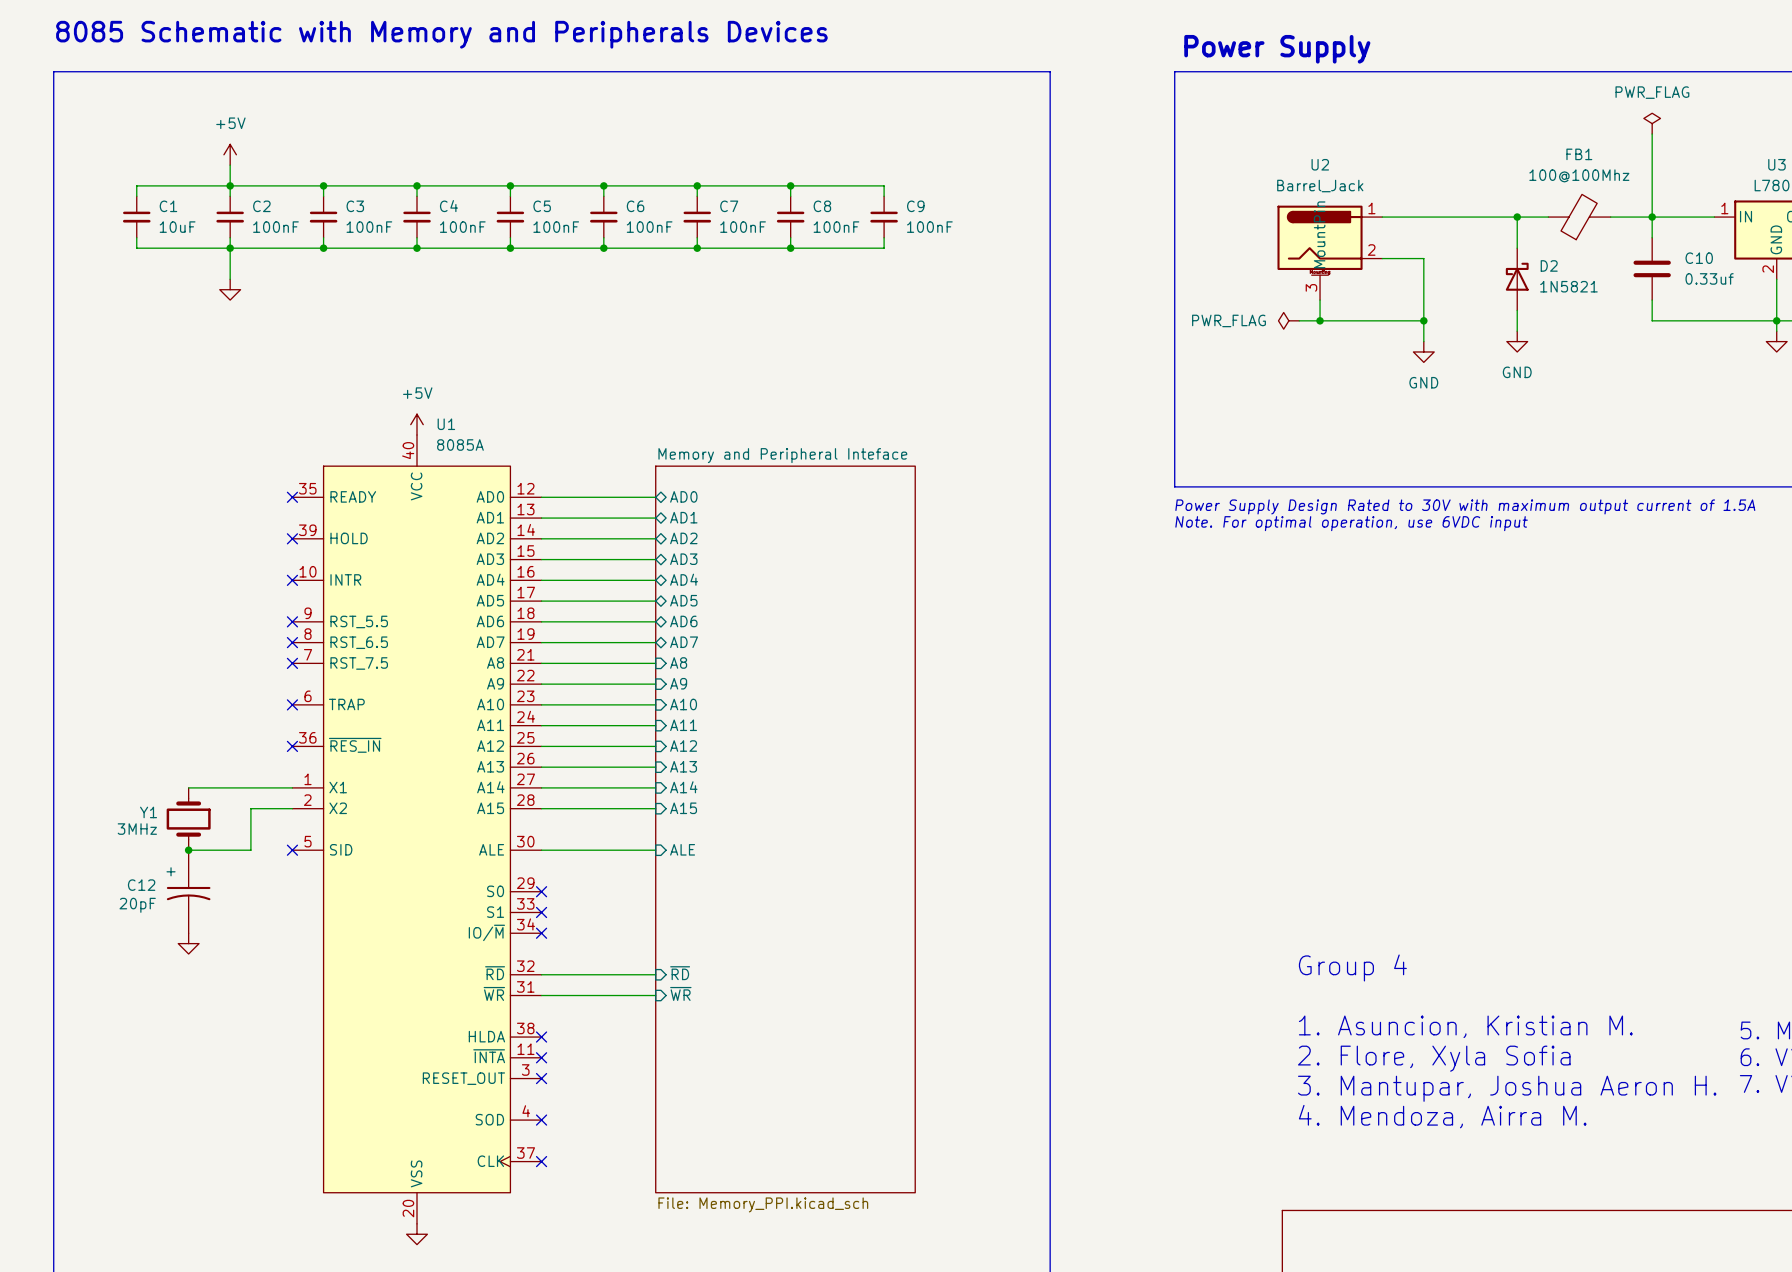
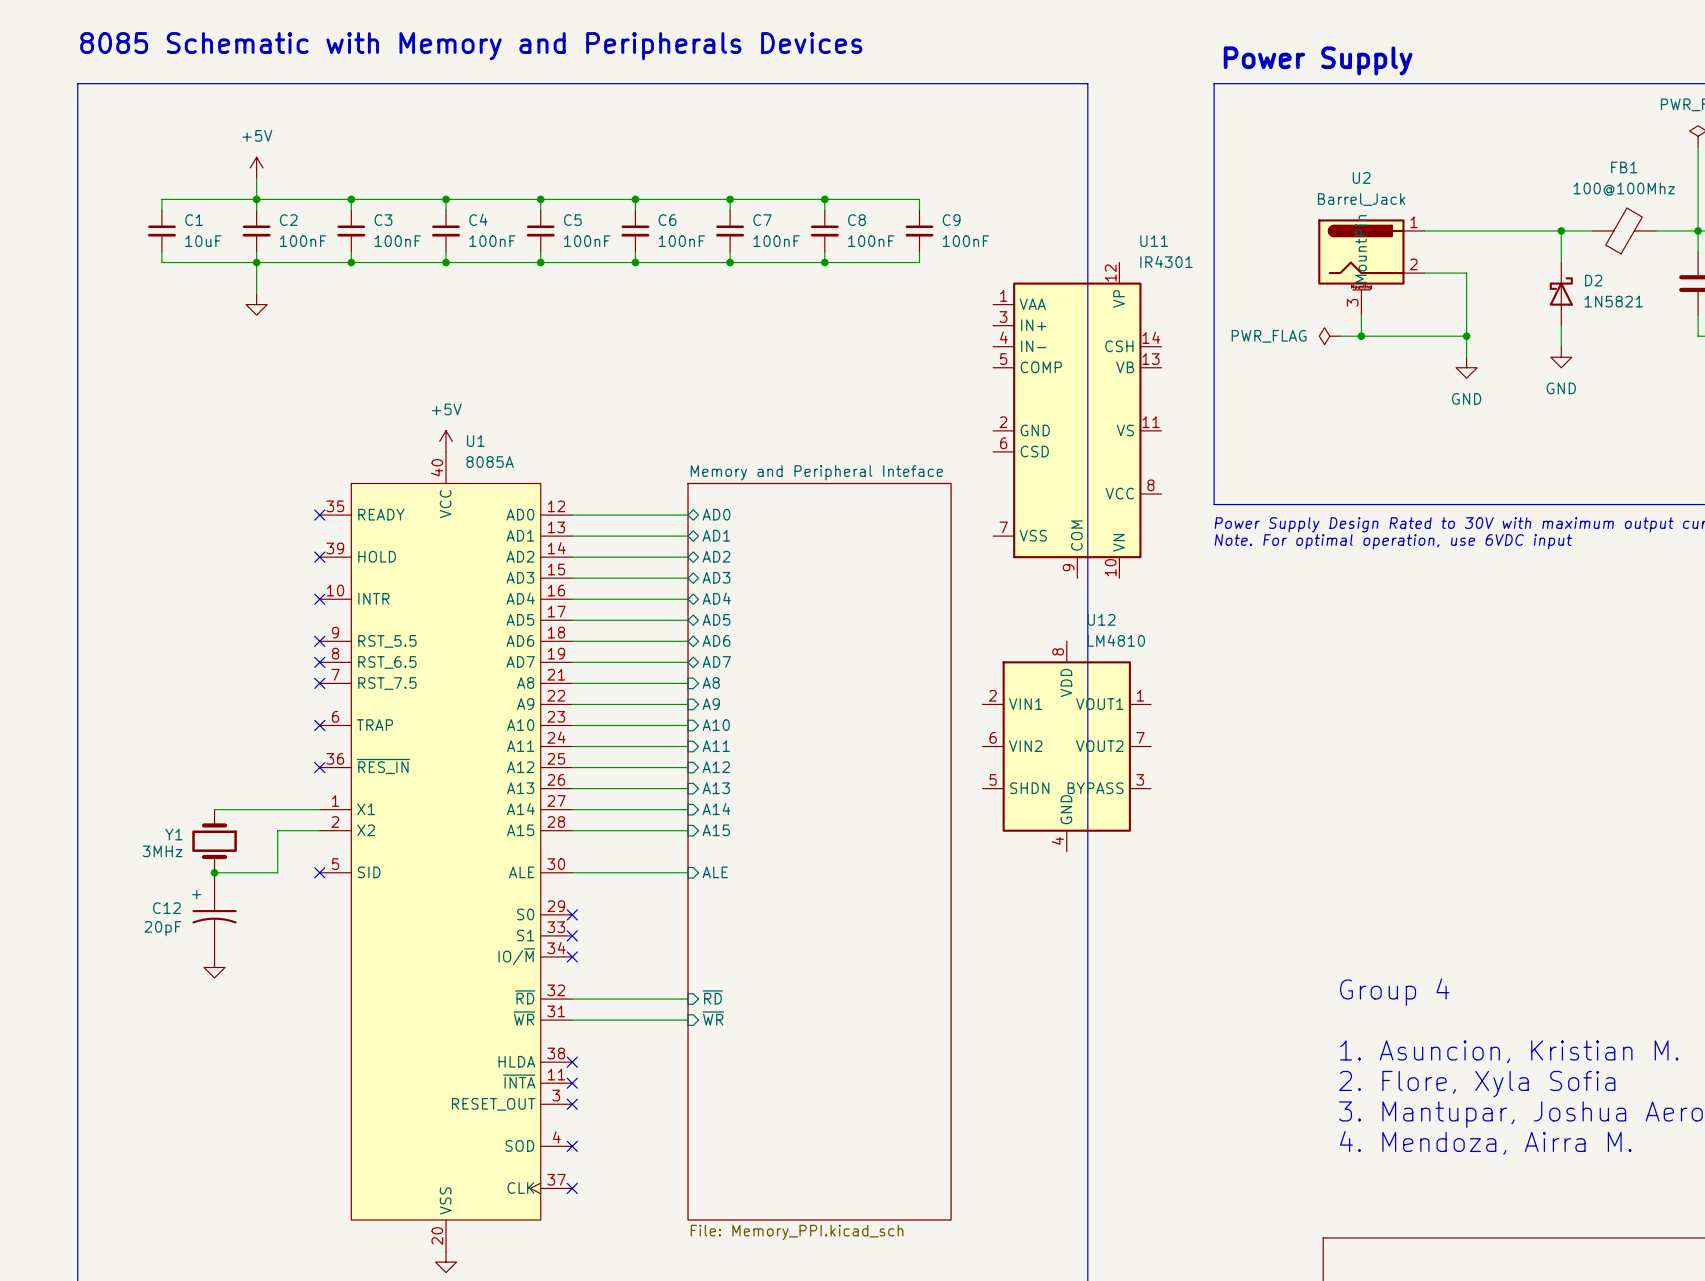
U11: none -> IR4301 (1077, 420)
U12: none -> LM4810 (1066, 746)

